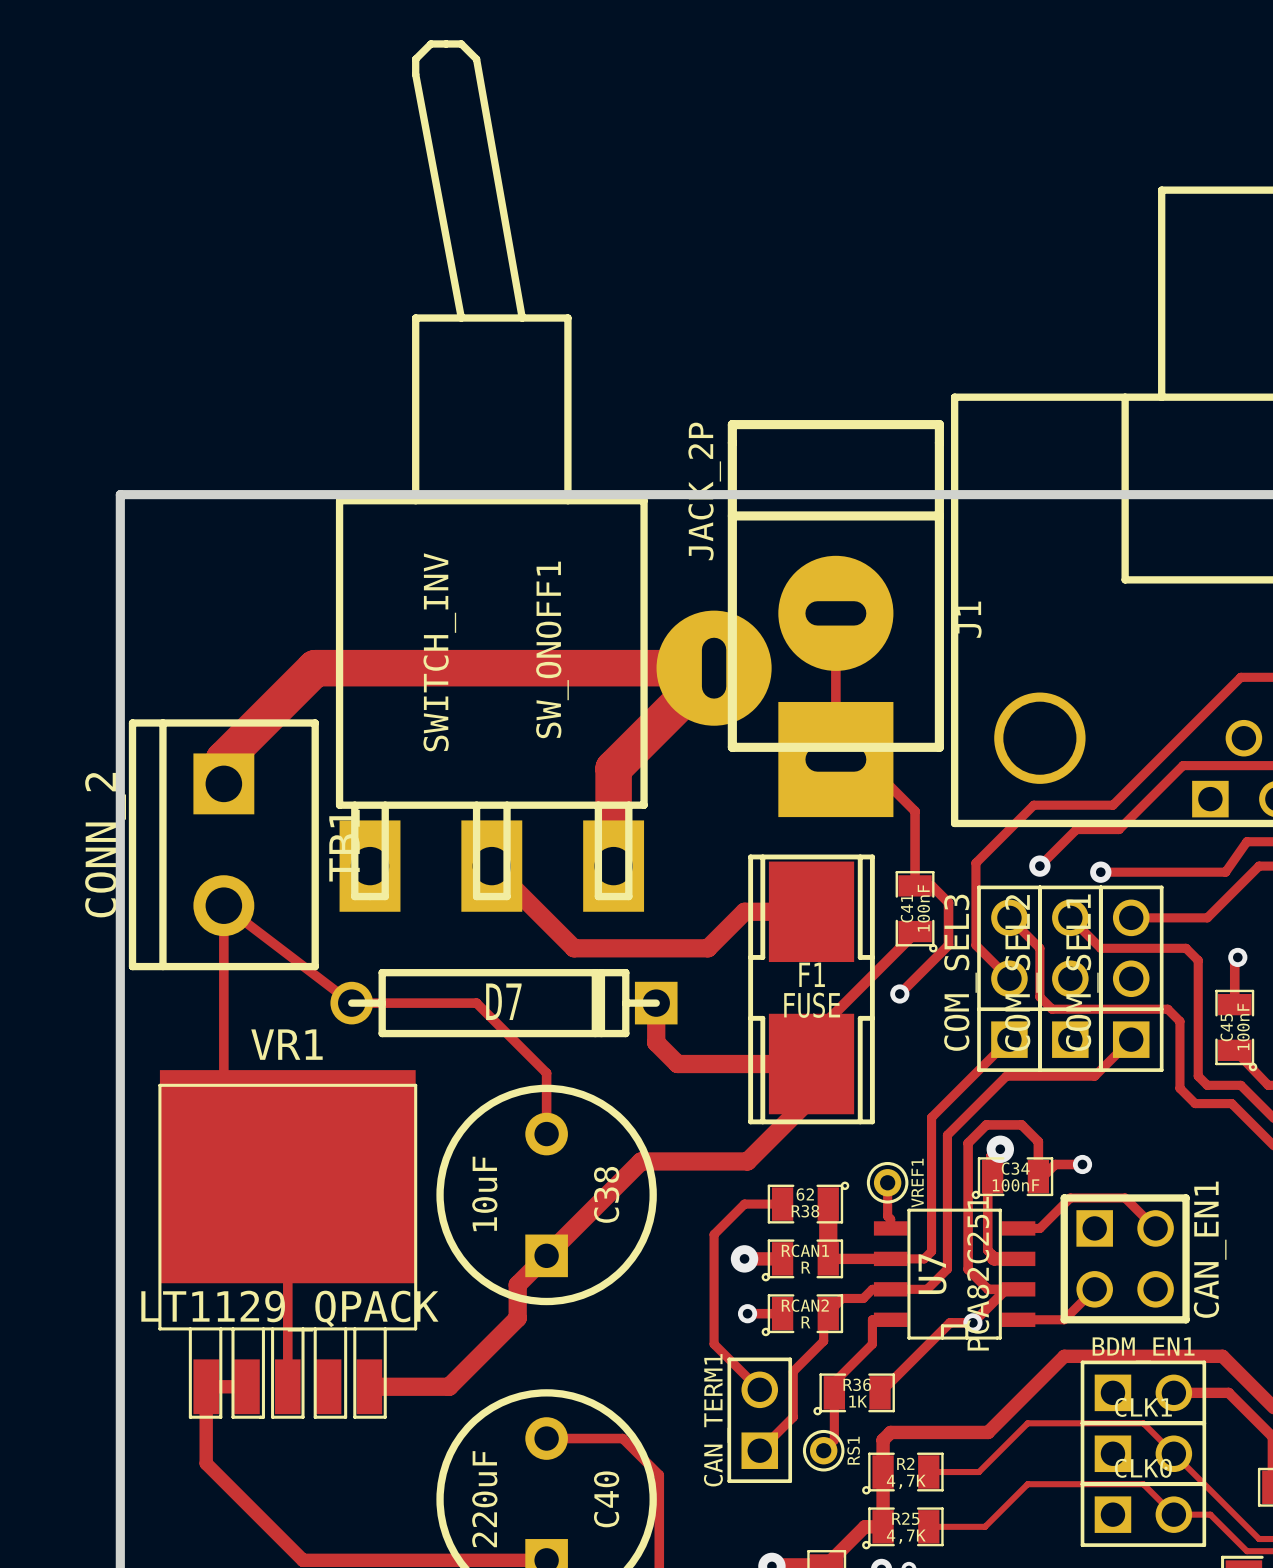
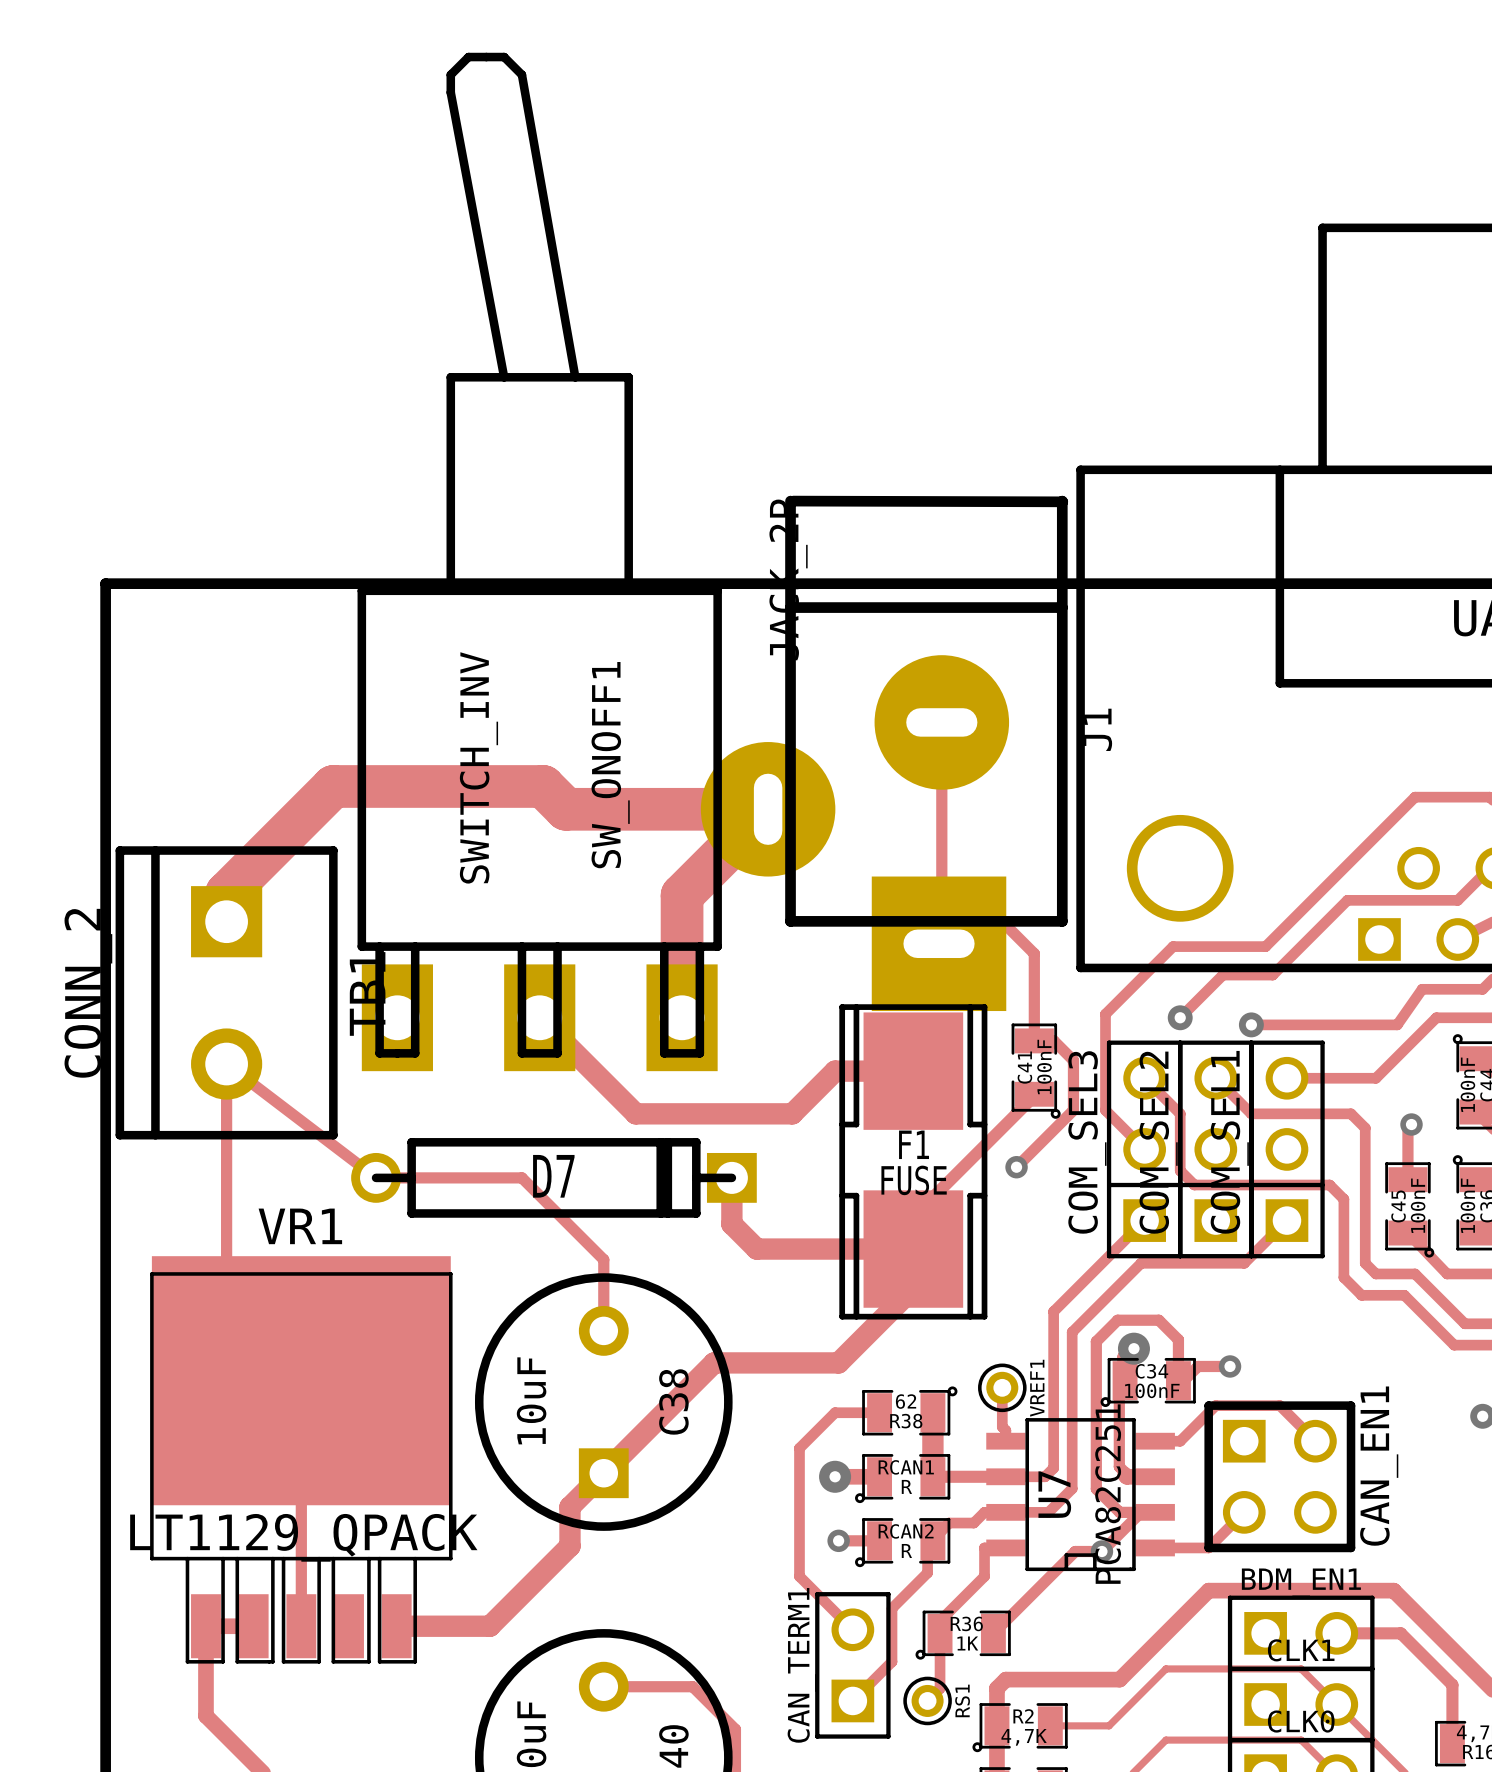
J1 footprint: [656, 420, 944, 818] -> [700, 495, 1069, 1012]
track: (494, 668) (714, 668) (613, 768) -> (543, 786) (566, 809) (768, 809) (682, 895) (682, 903)

